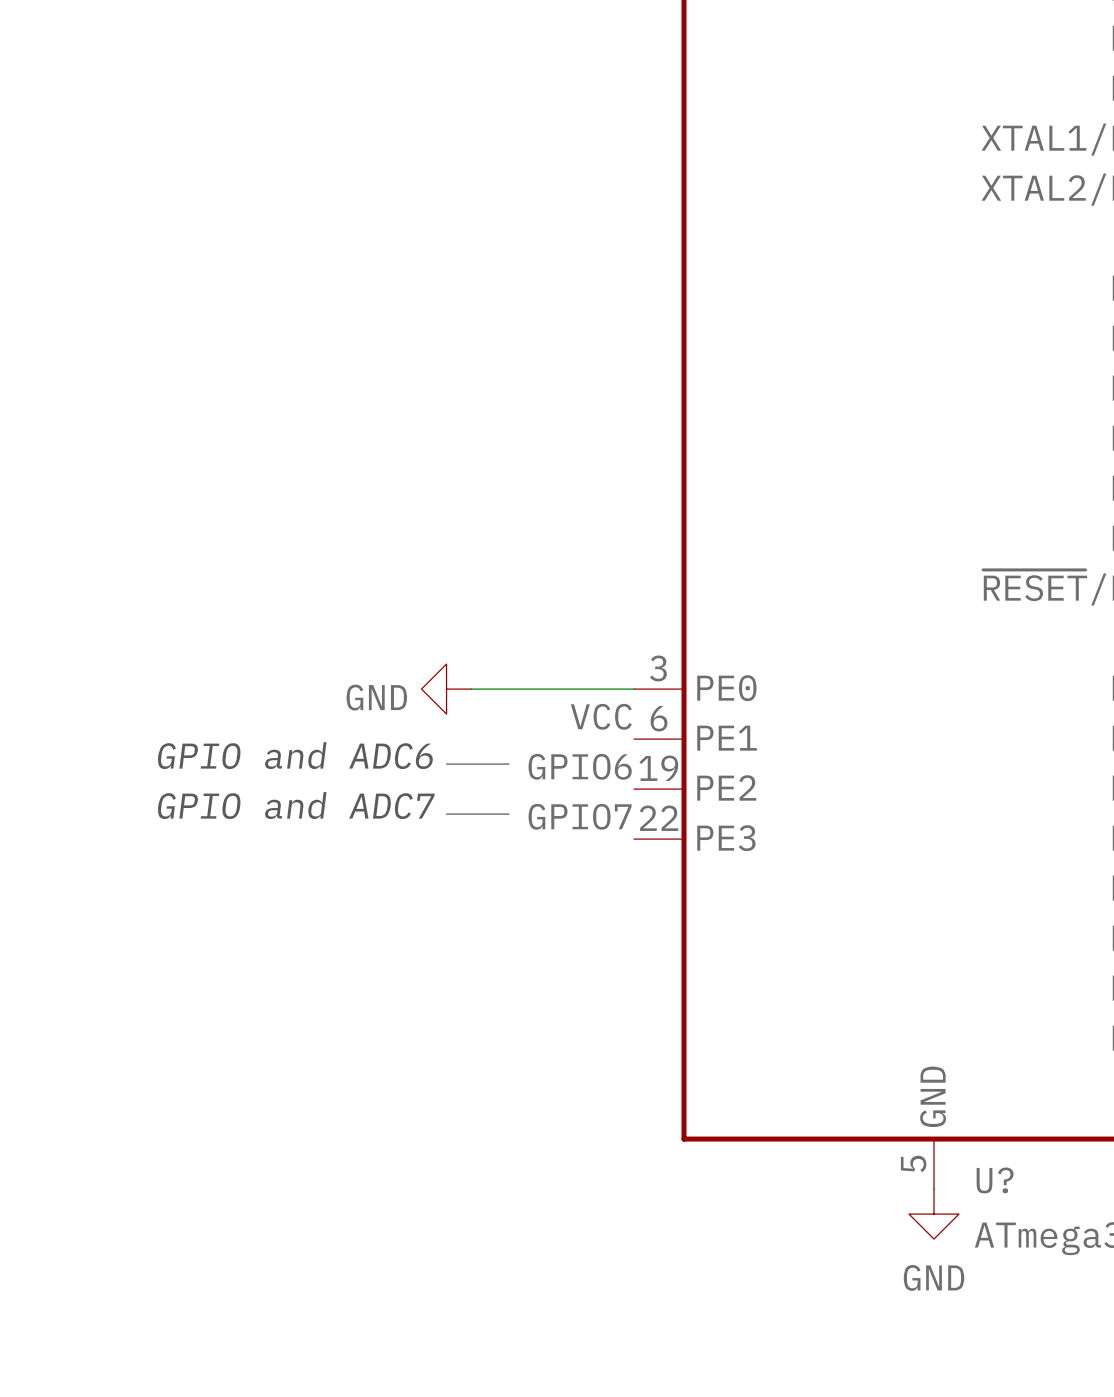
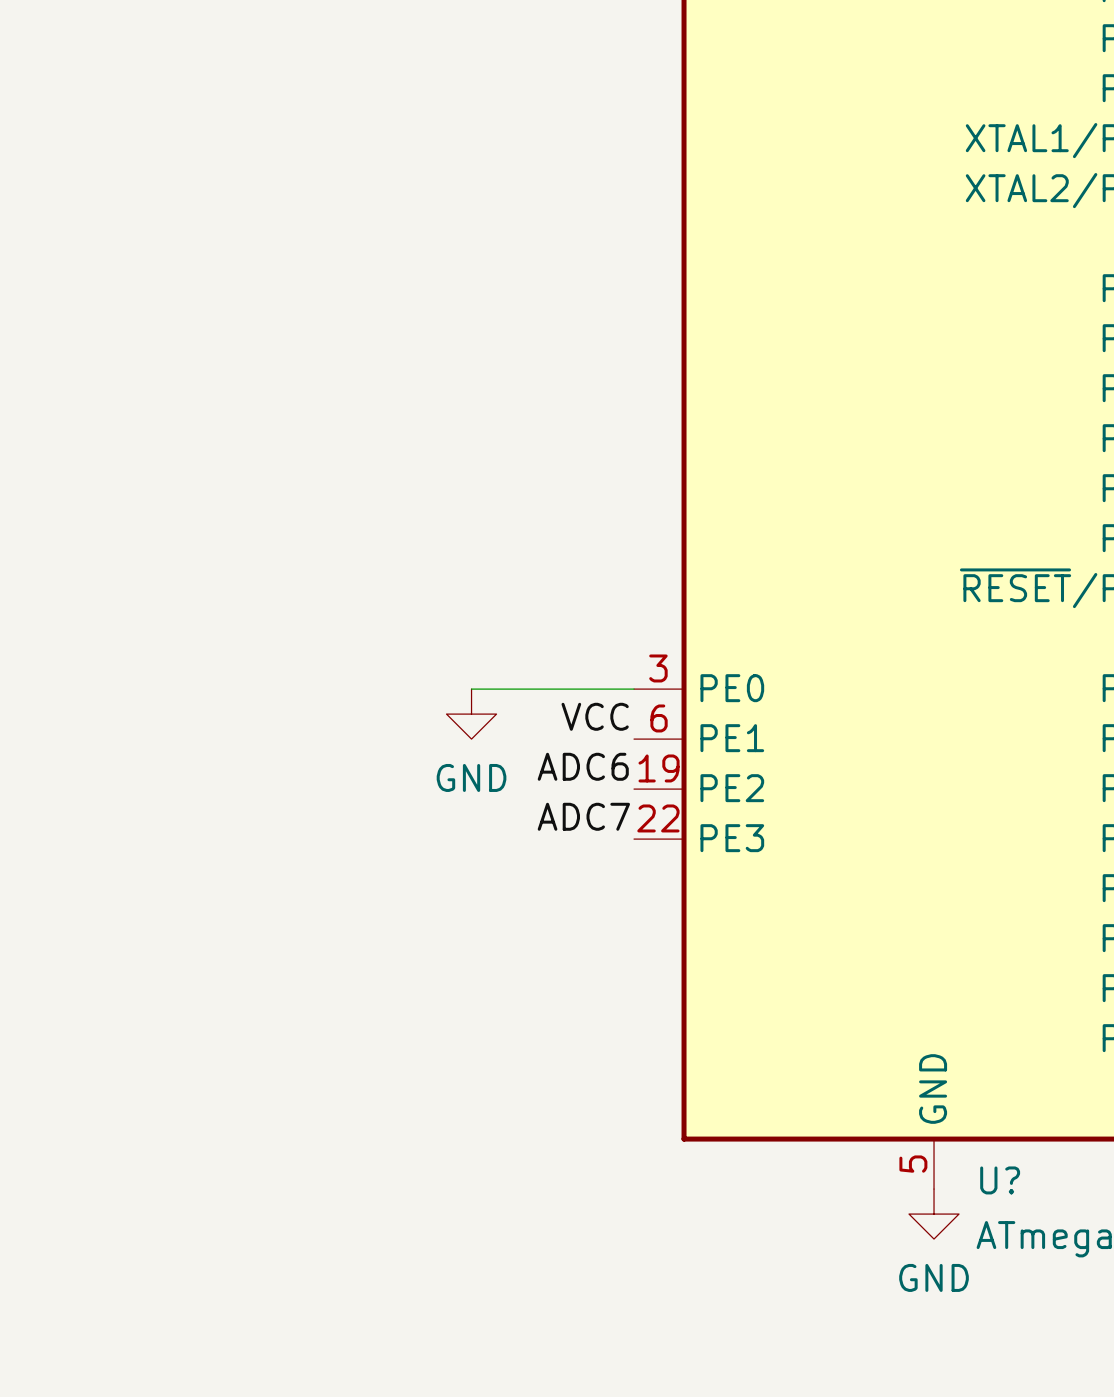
power symbol rotation: 0° (446, 689) -> 90° counterclockwise (471, 714)
power symbol position: GND (446, 689) -> GND (471, 714)
text: GPIO and ADC6 (295, 755) -> none
line: (446, 764) (509, 764) -> none
label: GPIO6 (580, 766) -> ADC6 (583, 766)
text: GPIO and ADC7 (296, 805) -> none
line: (446, 814) (509, 814) -> none
label: GPIO7 (580, 816) -> ADC7 (583, 816)

